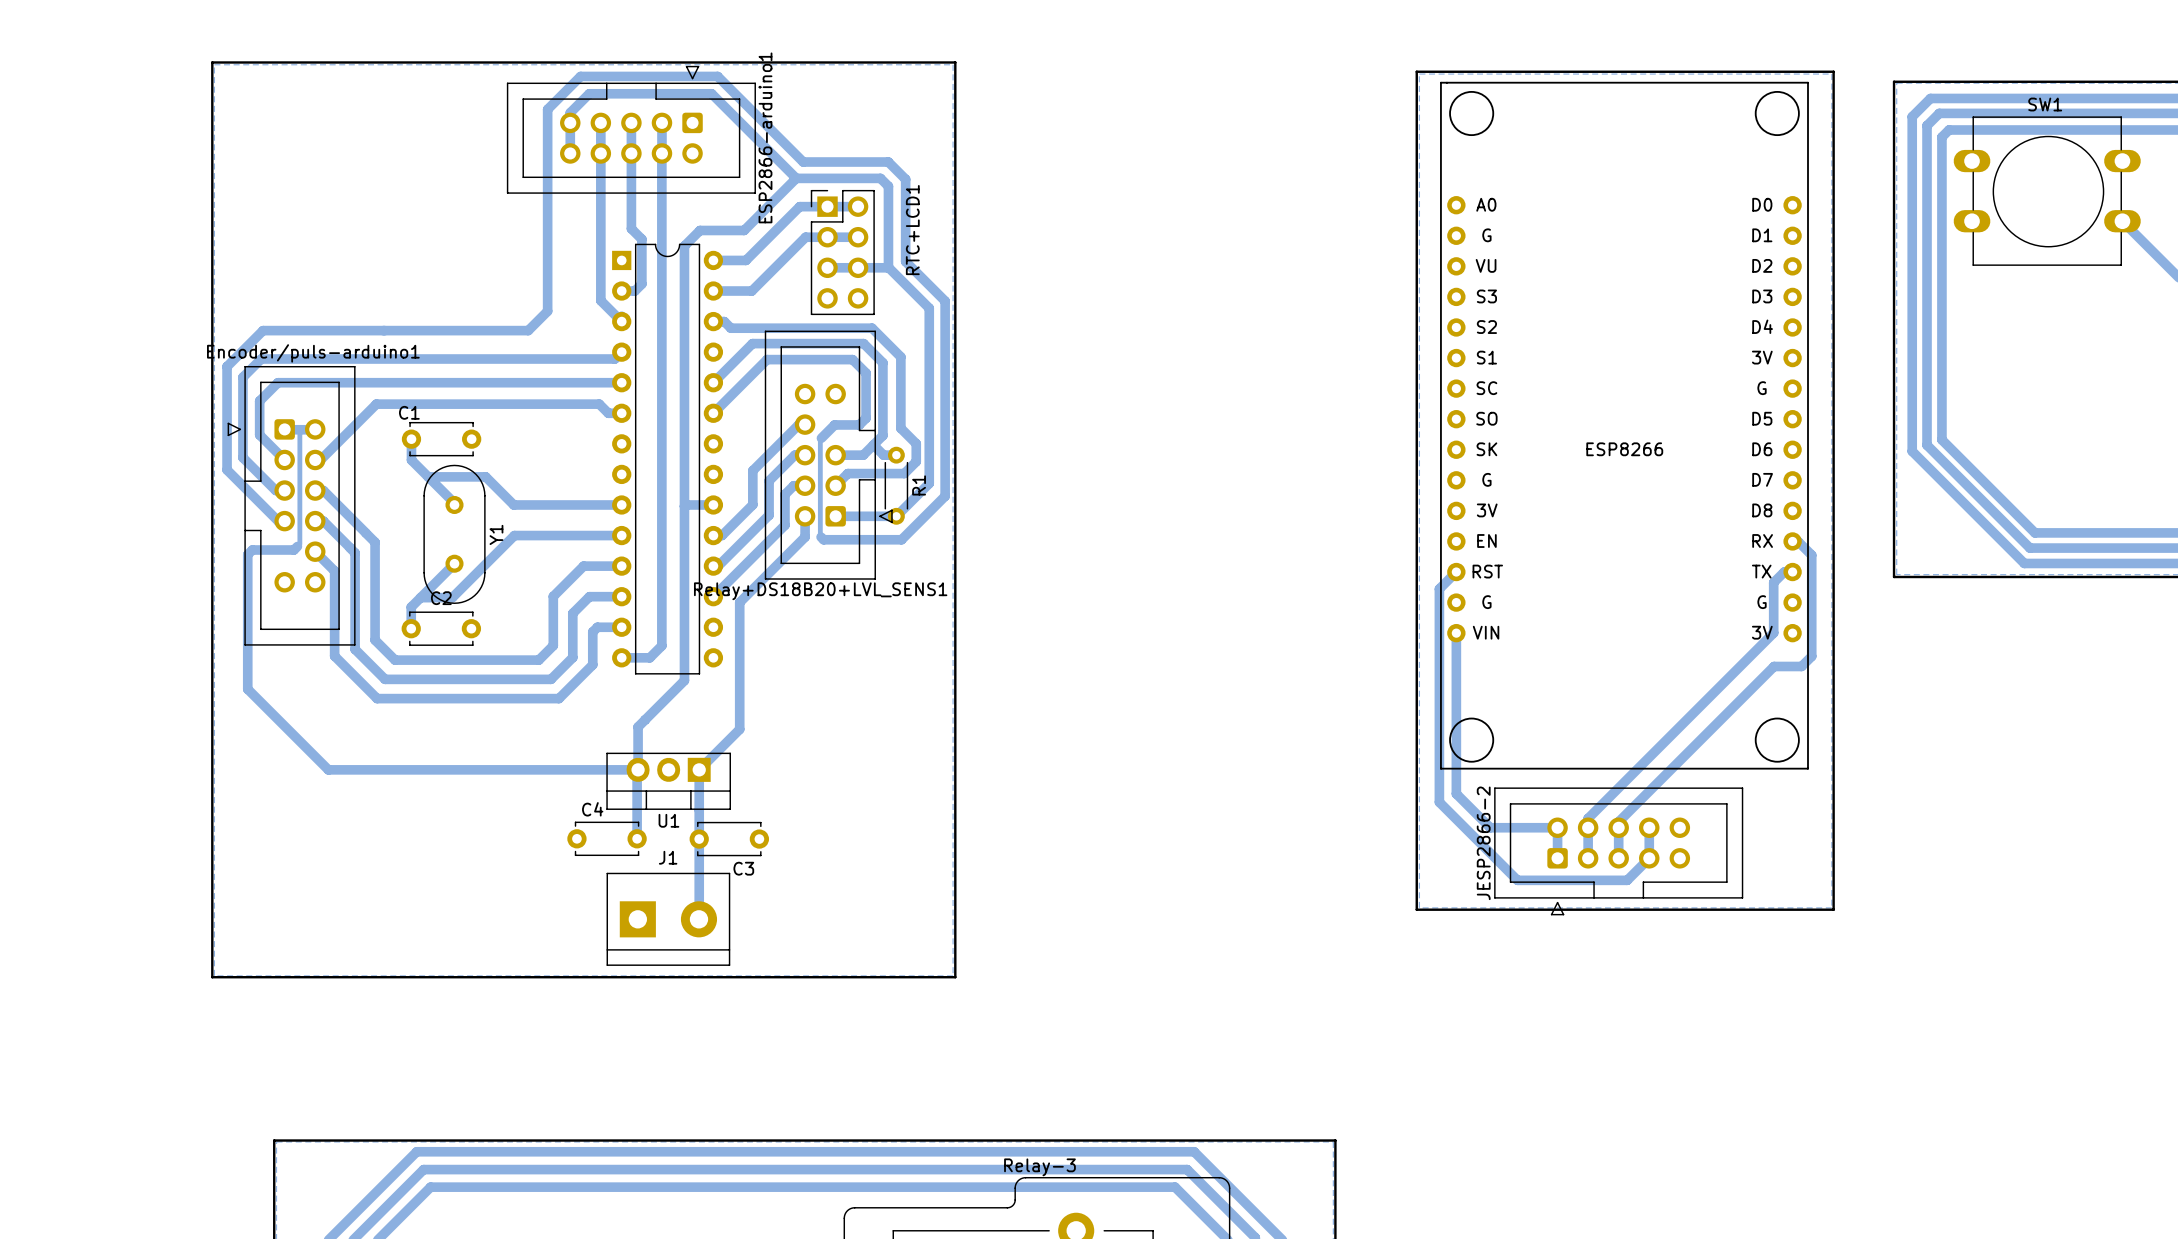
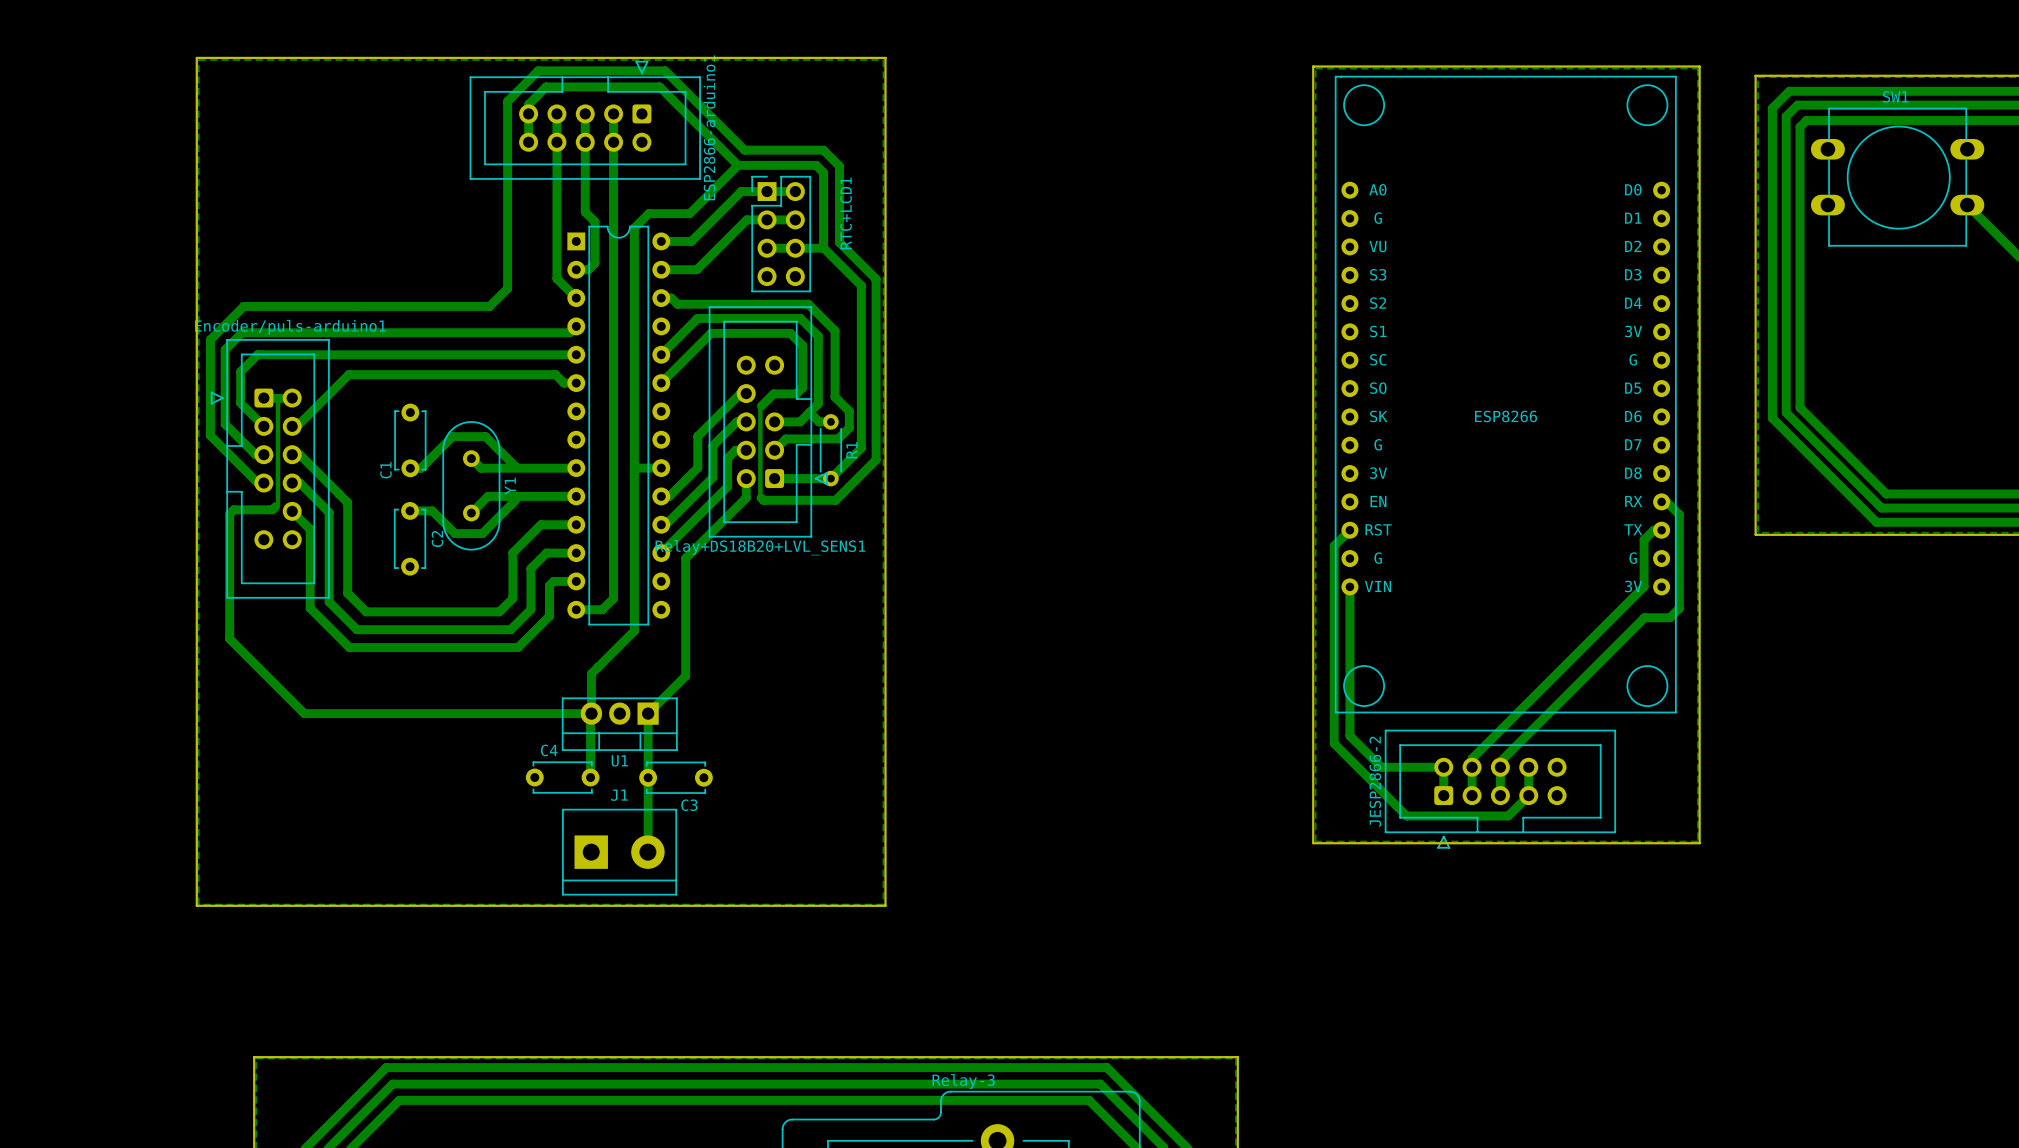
C1 name position: C1 (409, 412) -> C1 (385, 470)
bottom track: (411, 439) (411, 460) (454, 504) -> none
C1 rotation: 0° (441, 439) -> 90° clockwise (410, 440)
bottom track: (428, 476) (485, 476) (513, 504) (621, 504) -> (471, 458) (480, 468) (576, 468)
bottom track: none -> (516, 467) (485, 436) (452, 436) (420, 468) (410, 468)
Y1 position: (454, 534) -> (471, 485)
bottom track: (526, 535) (514, 535) (452, 597) (420, 597) -> (487, 496) (471, 513)
bottom track: none -> (515, 500) (482, 533) (454, 533) (432, 510) (410, 510)
bottom track: (454, 563) (411, 607) (412, 630) -> none
C2 rotation: 0° (441, 628) -> 90° clockwise (410, 538)

